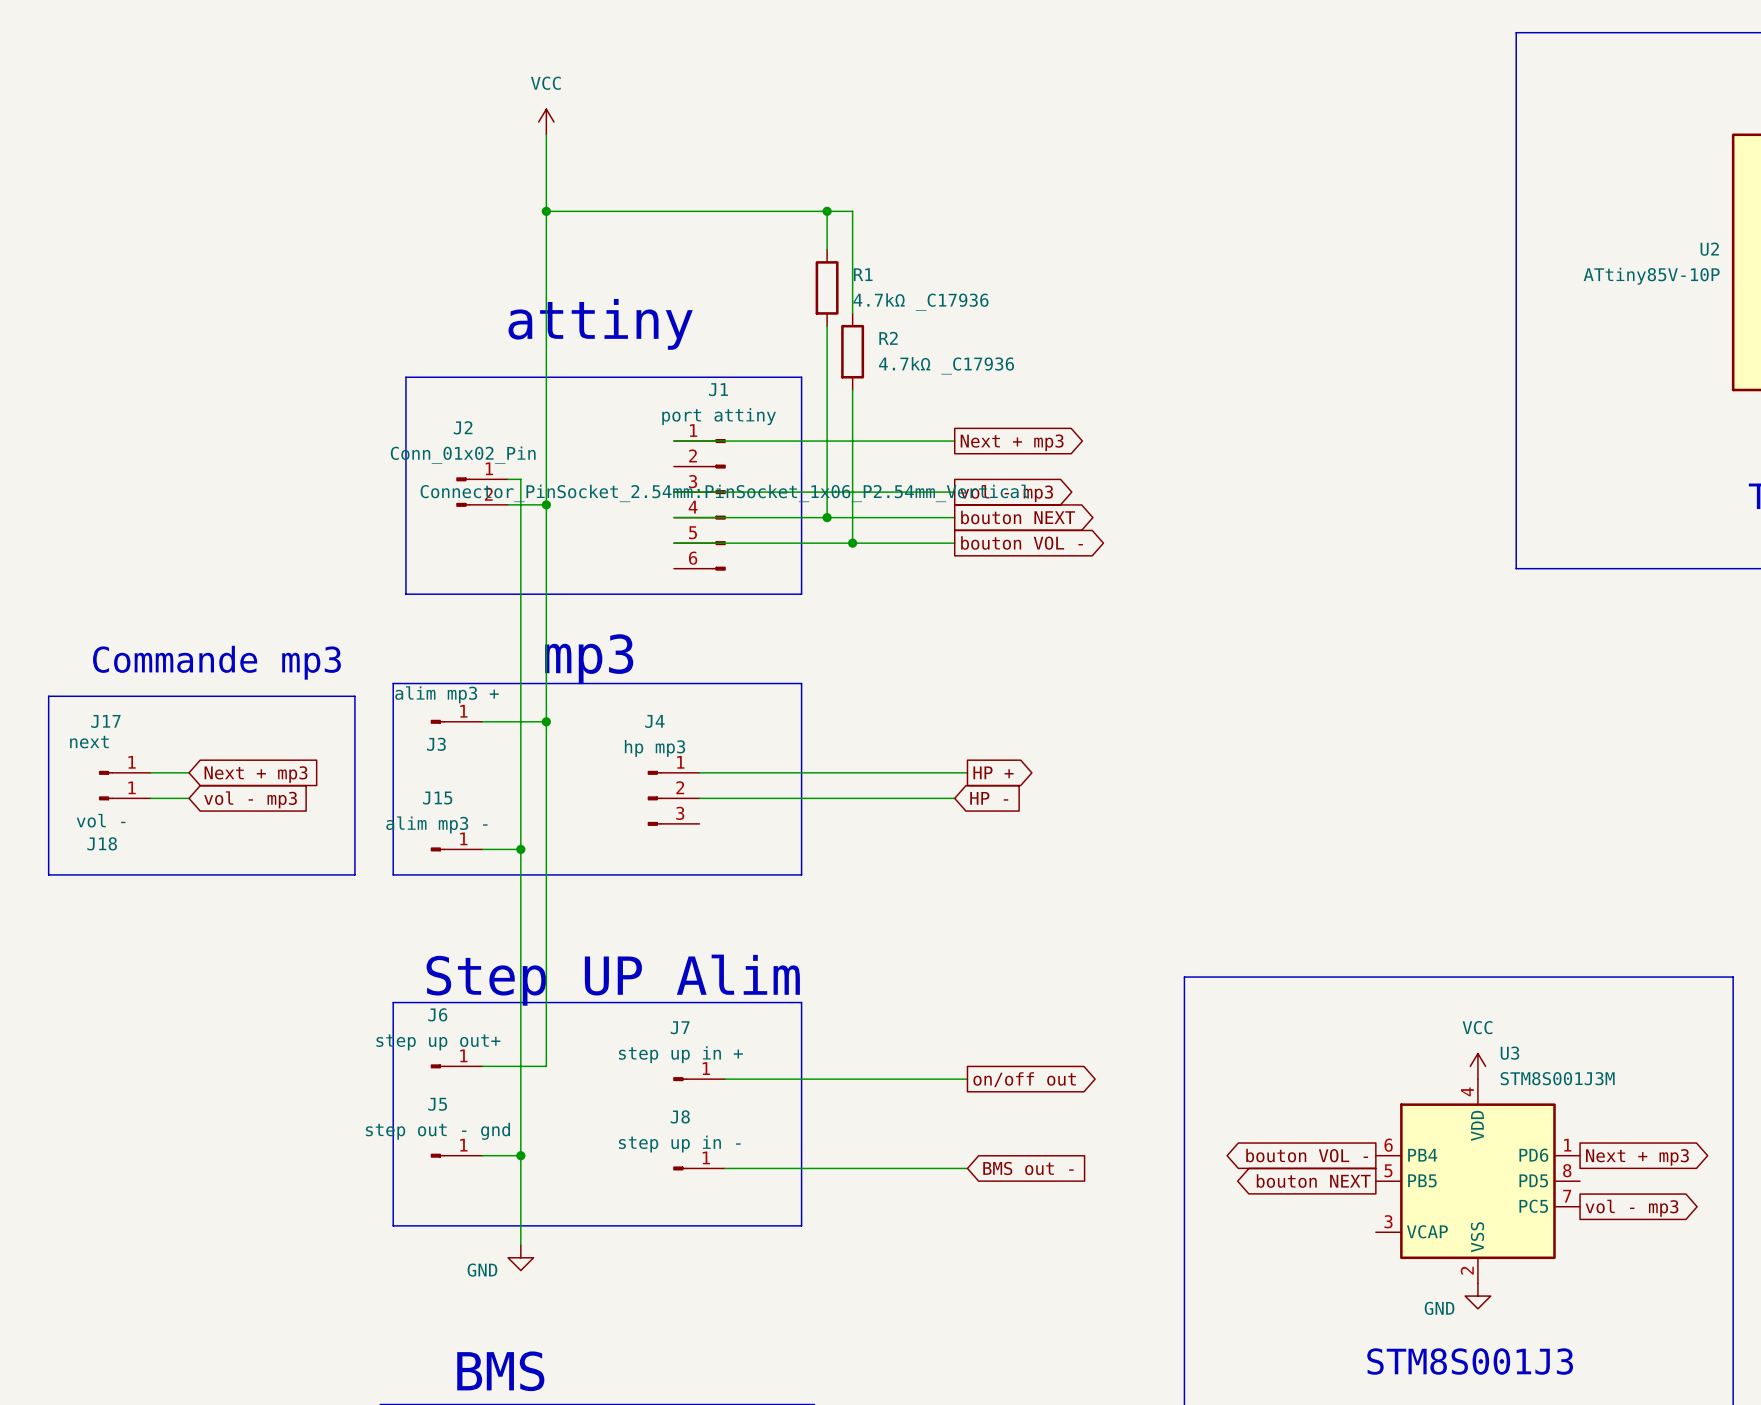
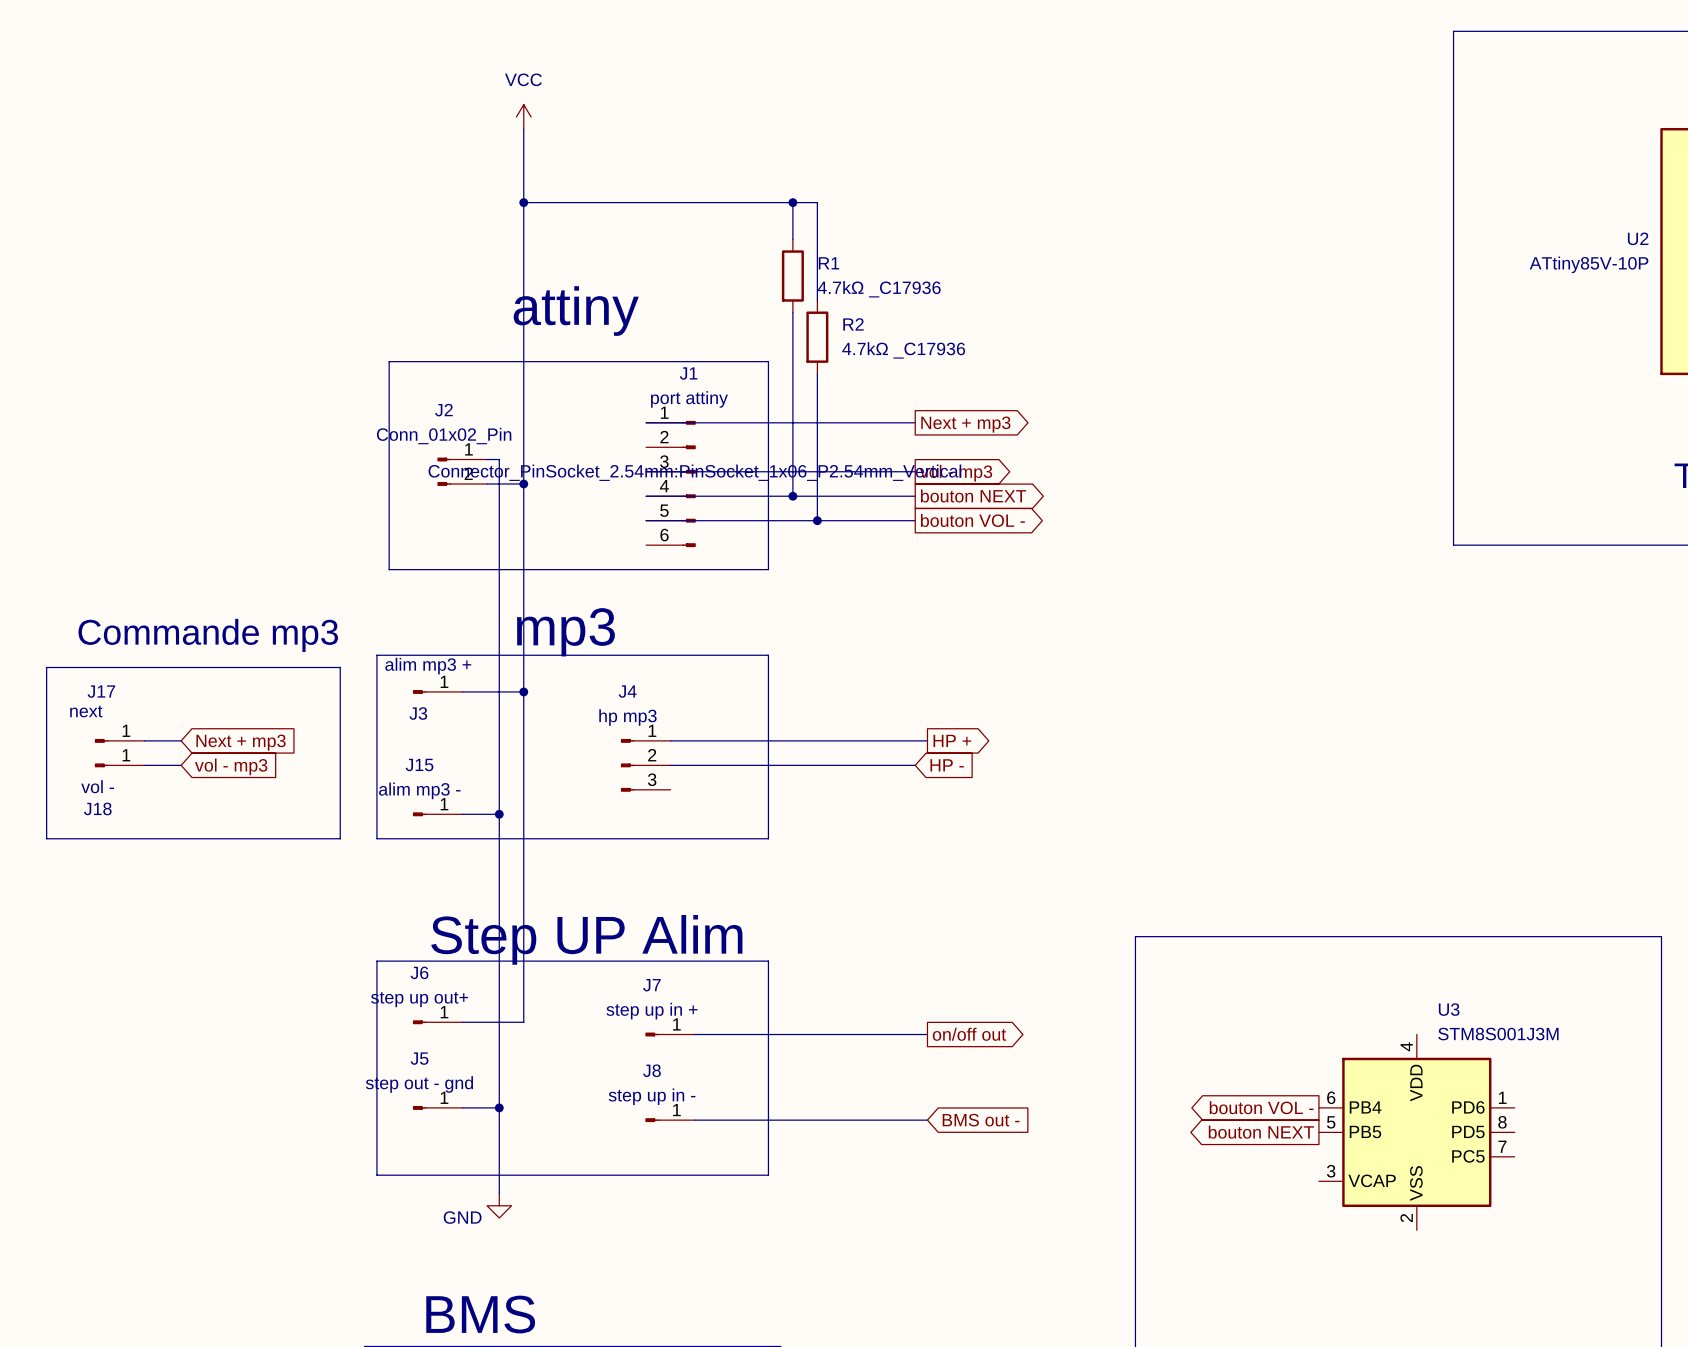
power symbol: VCC (1477, 1066) -> none
global label: Next + mp3 (1637, 1157) -> none
global label: vol - mp3 (1632, 1208) -> none
power symbol: GND (1477, 1296) -> none
text: STM8S001J3 (1470, 1361) -> none

